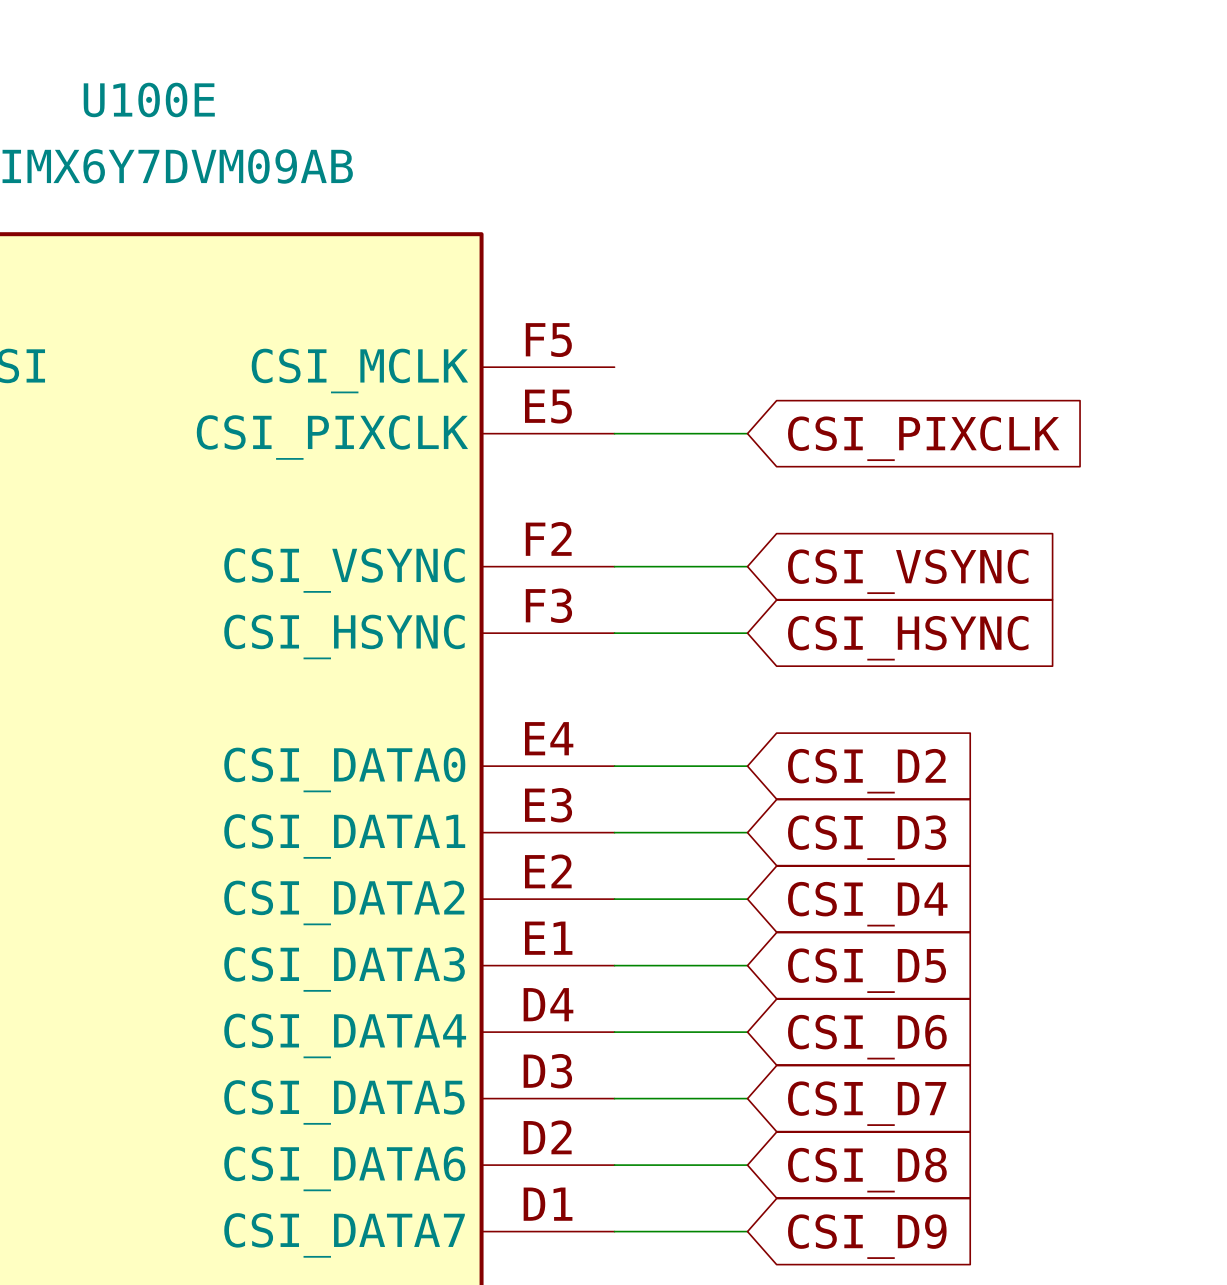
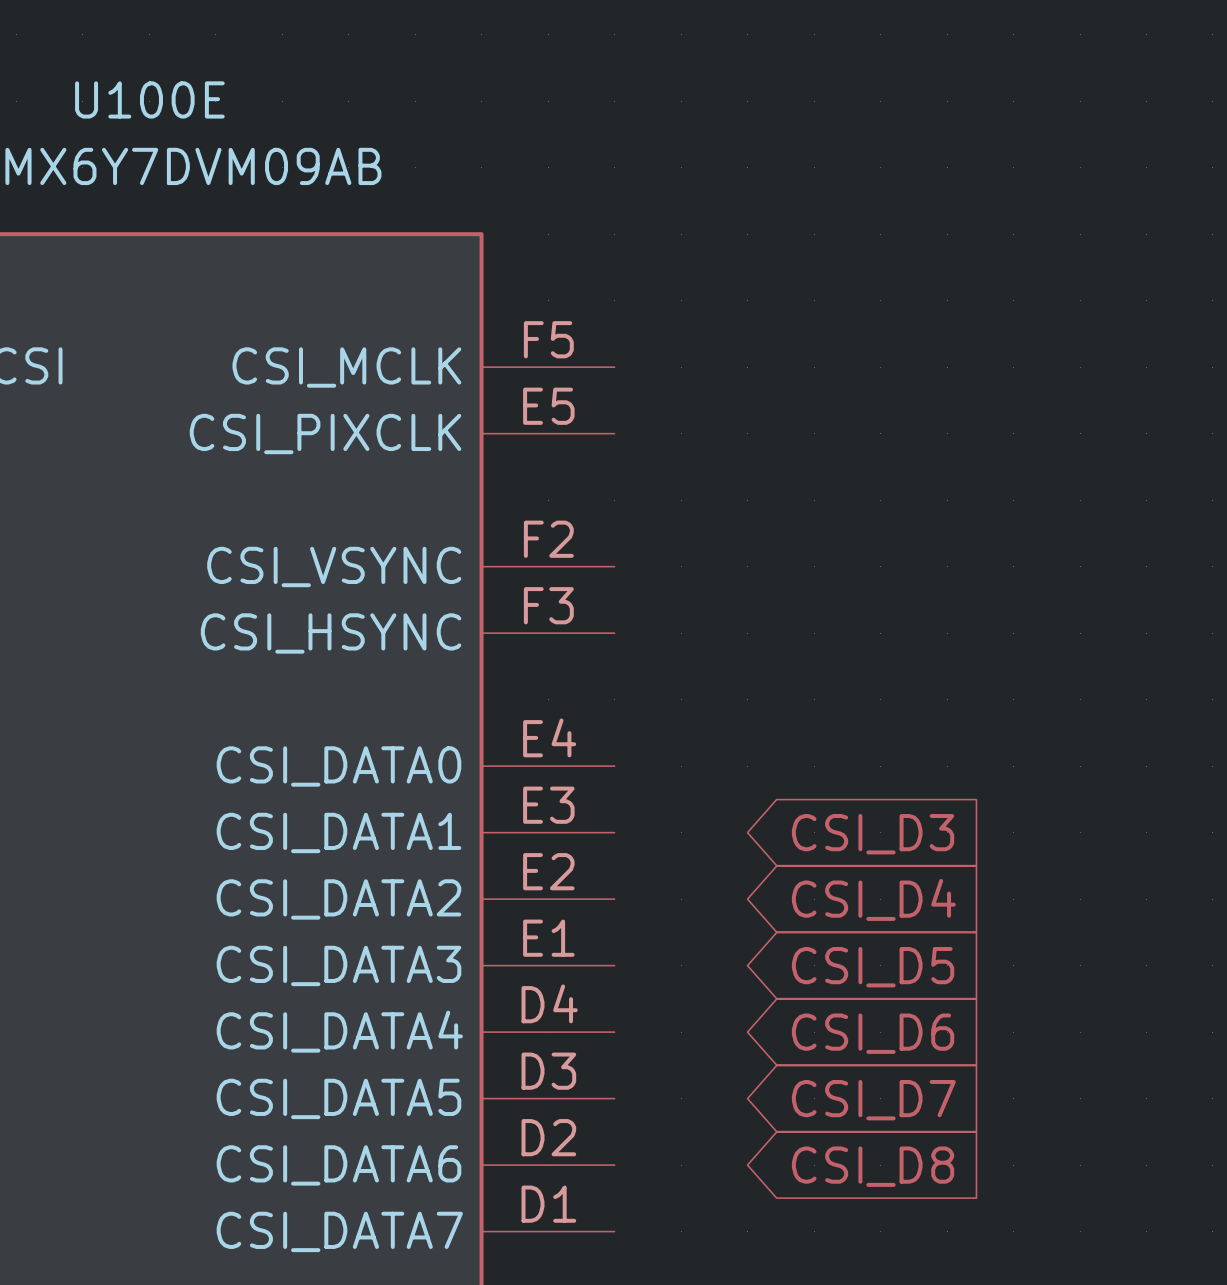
wire: (614, 433) (747, 433) -> none
global label: CSI_PIXCLK (923, 438) -> none
wire: (614, 566) (747, 566) -> none
global label: CSI_VSYNC (908, 571) -> none
wire: (614, 633) (747, 633) -> none
global label: CSI_HSYNC (908, 638) -> none
wire: (614, 766) (747, 766) -> none
global label: CSI_D2 (866, 771) -> none
wire: (614, 832) (747, 832) -> none
wire: (614, 899) (747, 899) -> none
wire: (614, 965) (747, 965) -> none
wire: (614, 1032) (747, 1032) -> none
wire: (614, 1098) (747, 1098) -> none
wire: (614, 1165) (747, 1165) -> none
wire: (614, 1231) (747, 1231) -> none
global label: CSI_D9 (867, 1236) -> none

